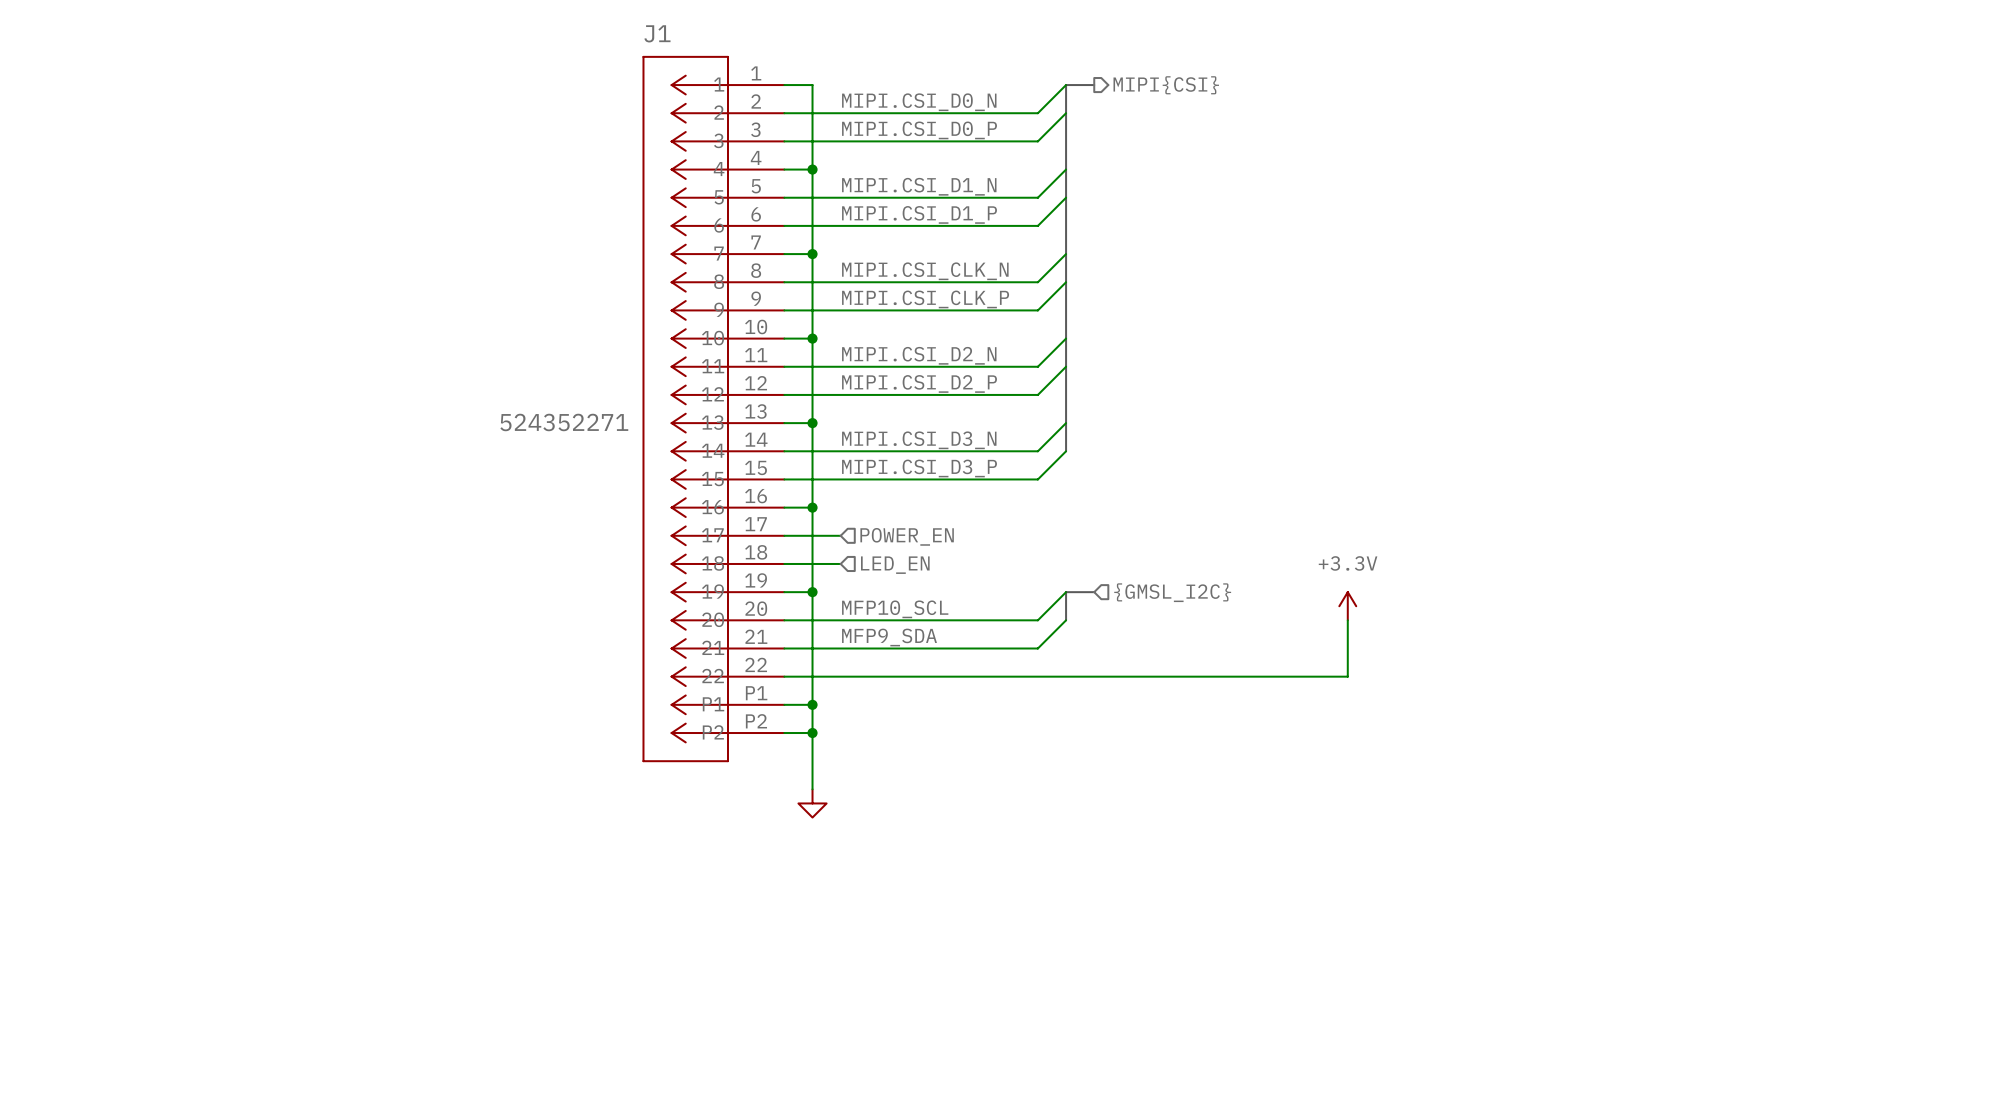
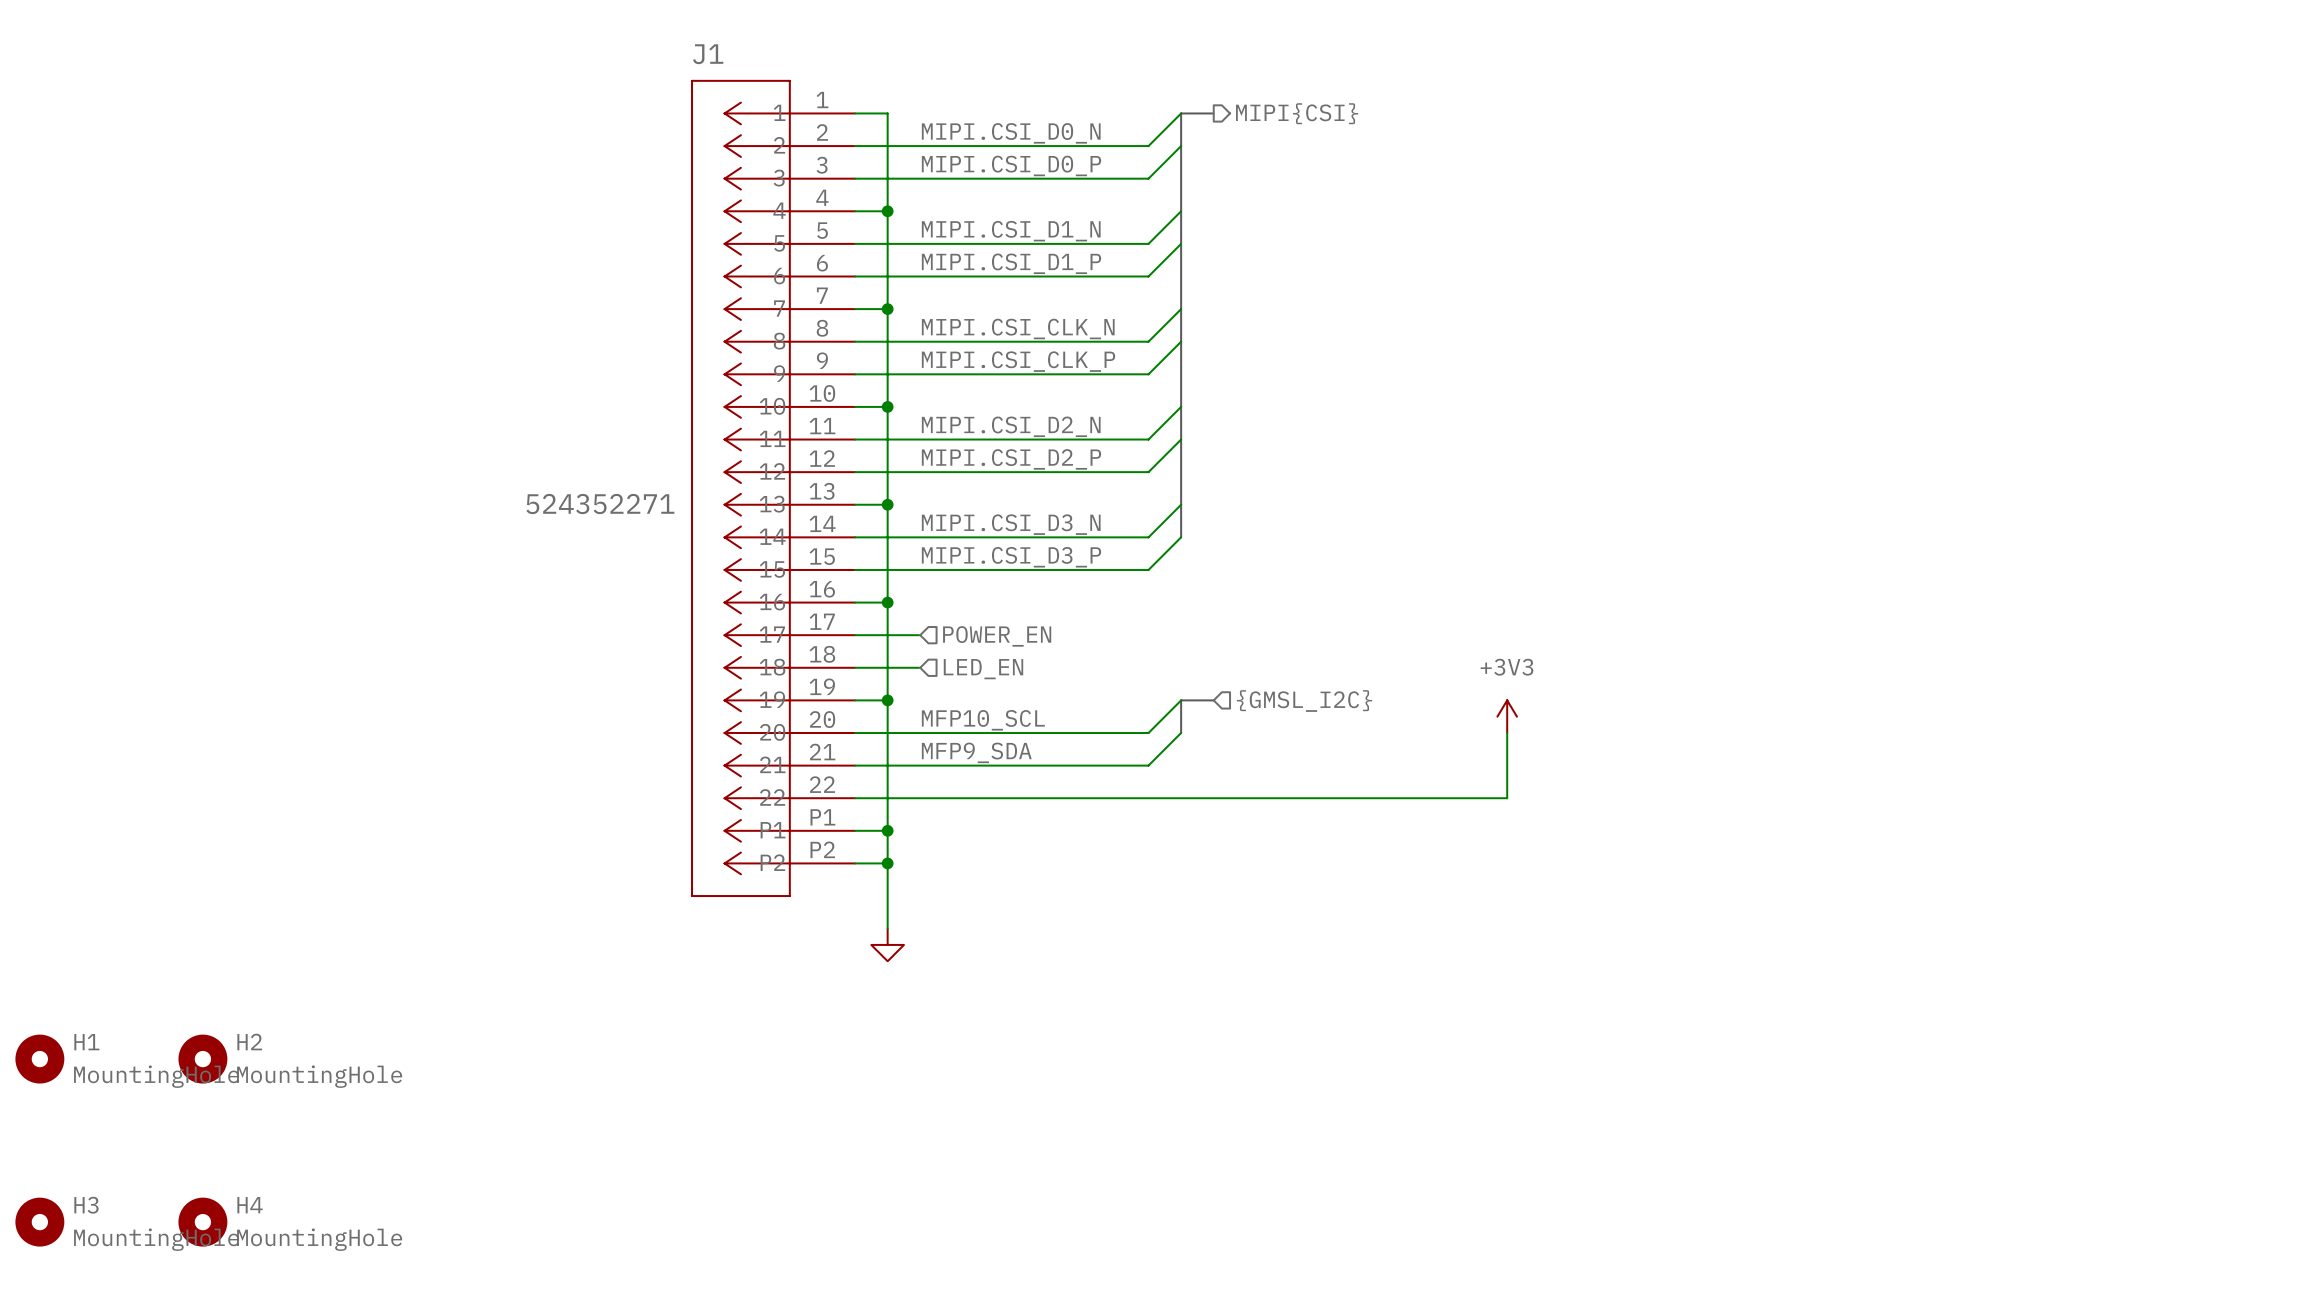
power symbol: +3.3V (1347, 606) -> +3V3 (1507, 716)
H1: none -> MountingHole (39, 1059)
H2: none -> MountingHole (202, 1059)
H3: none -> MountingHole (39, 1222)
H4: none -> MountingHole (202, 1222)

